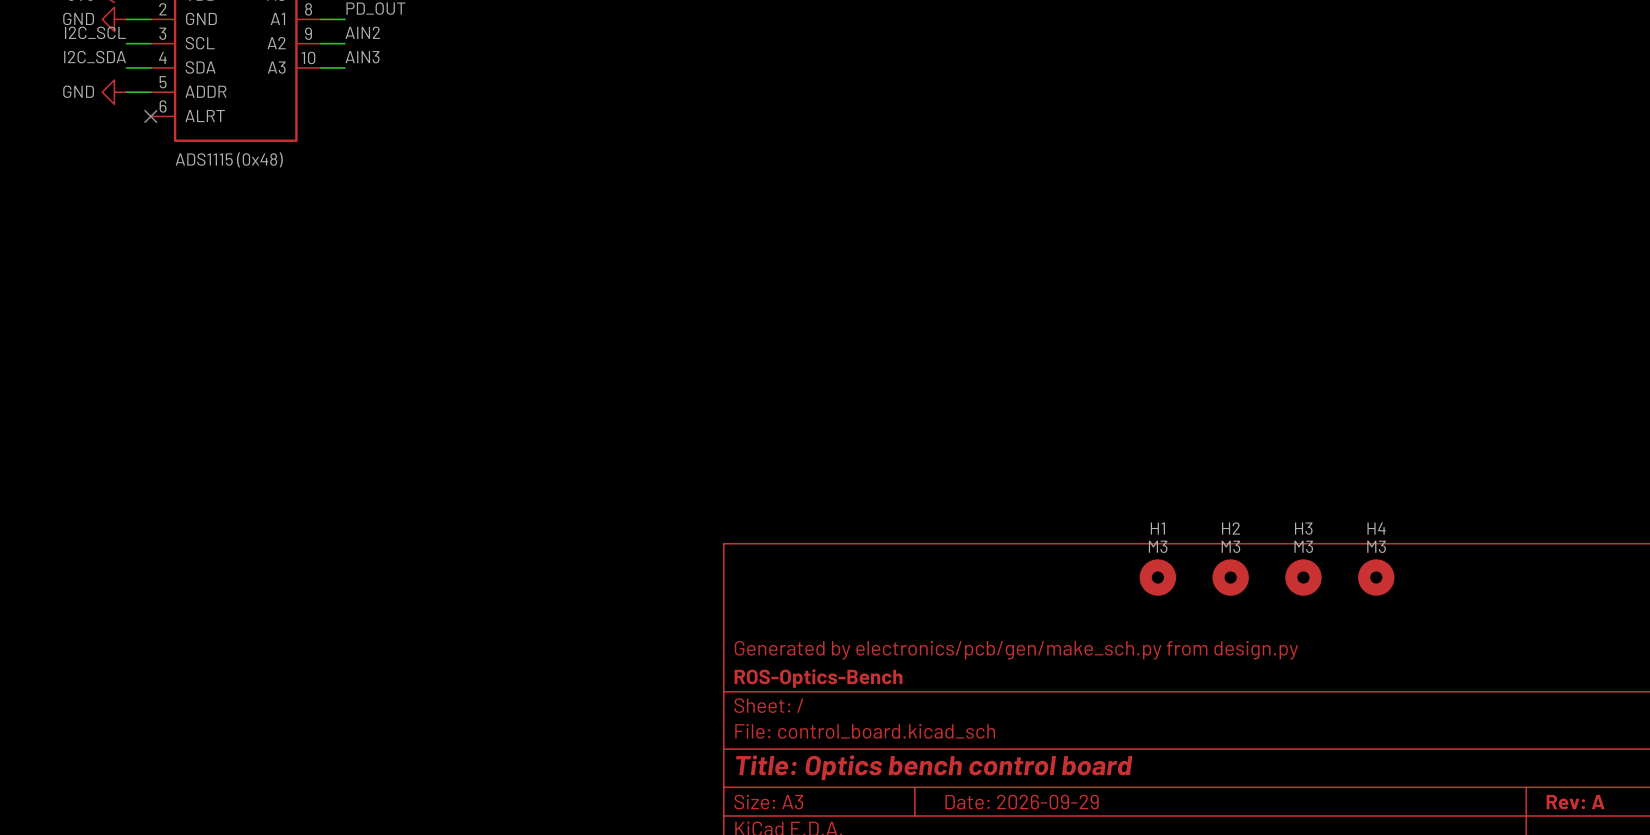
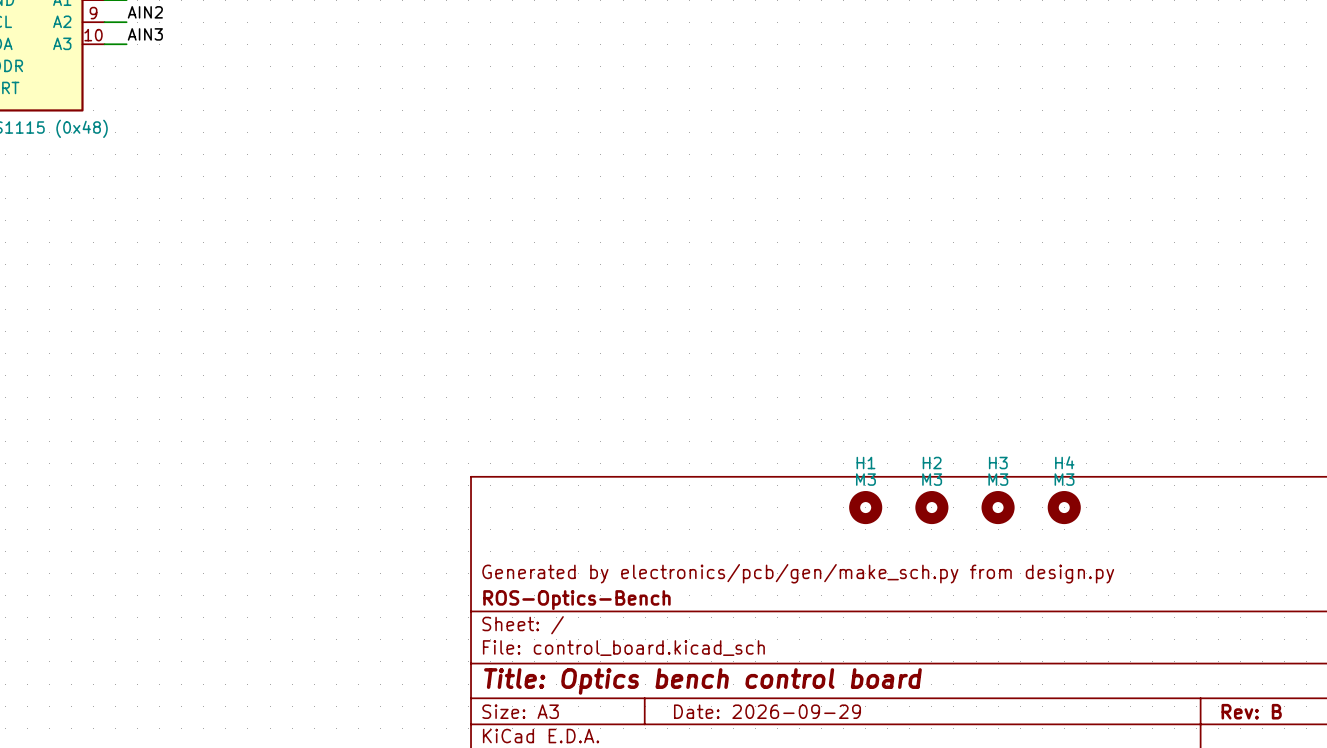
title block: Rev: A (1575, 802) -> Rev: B (1251, 711)

